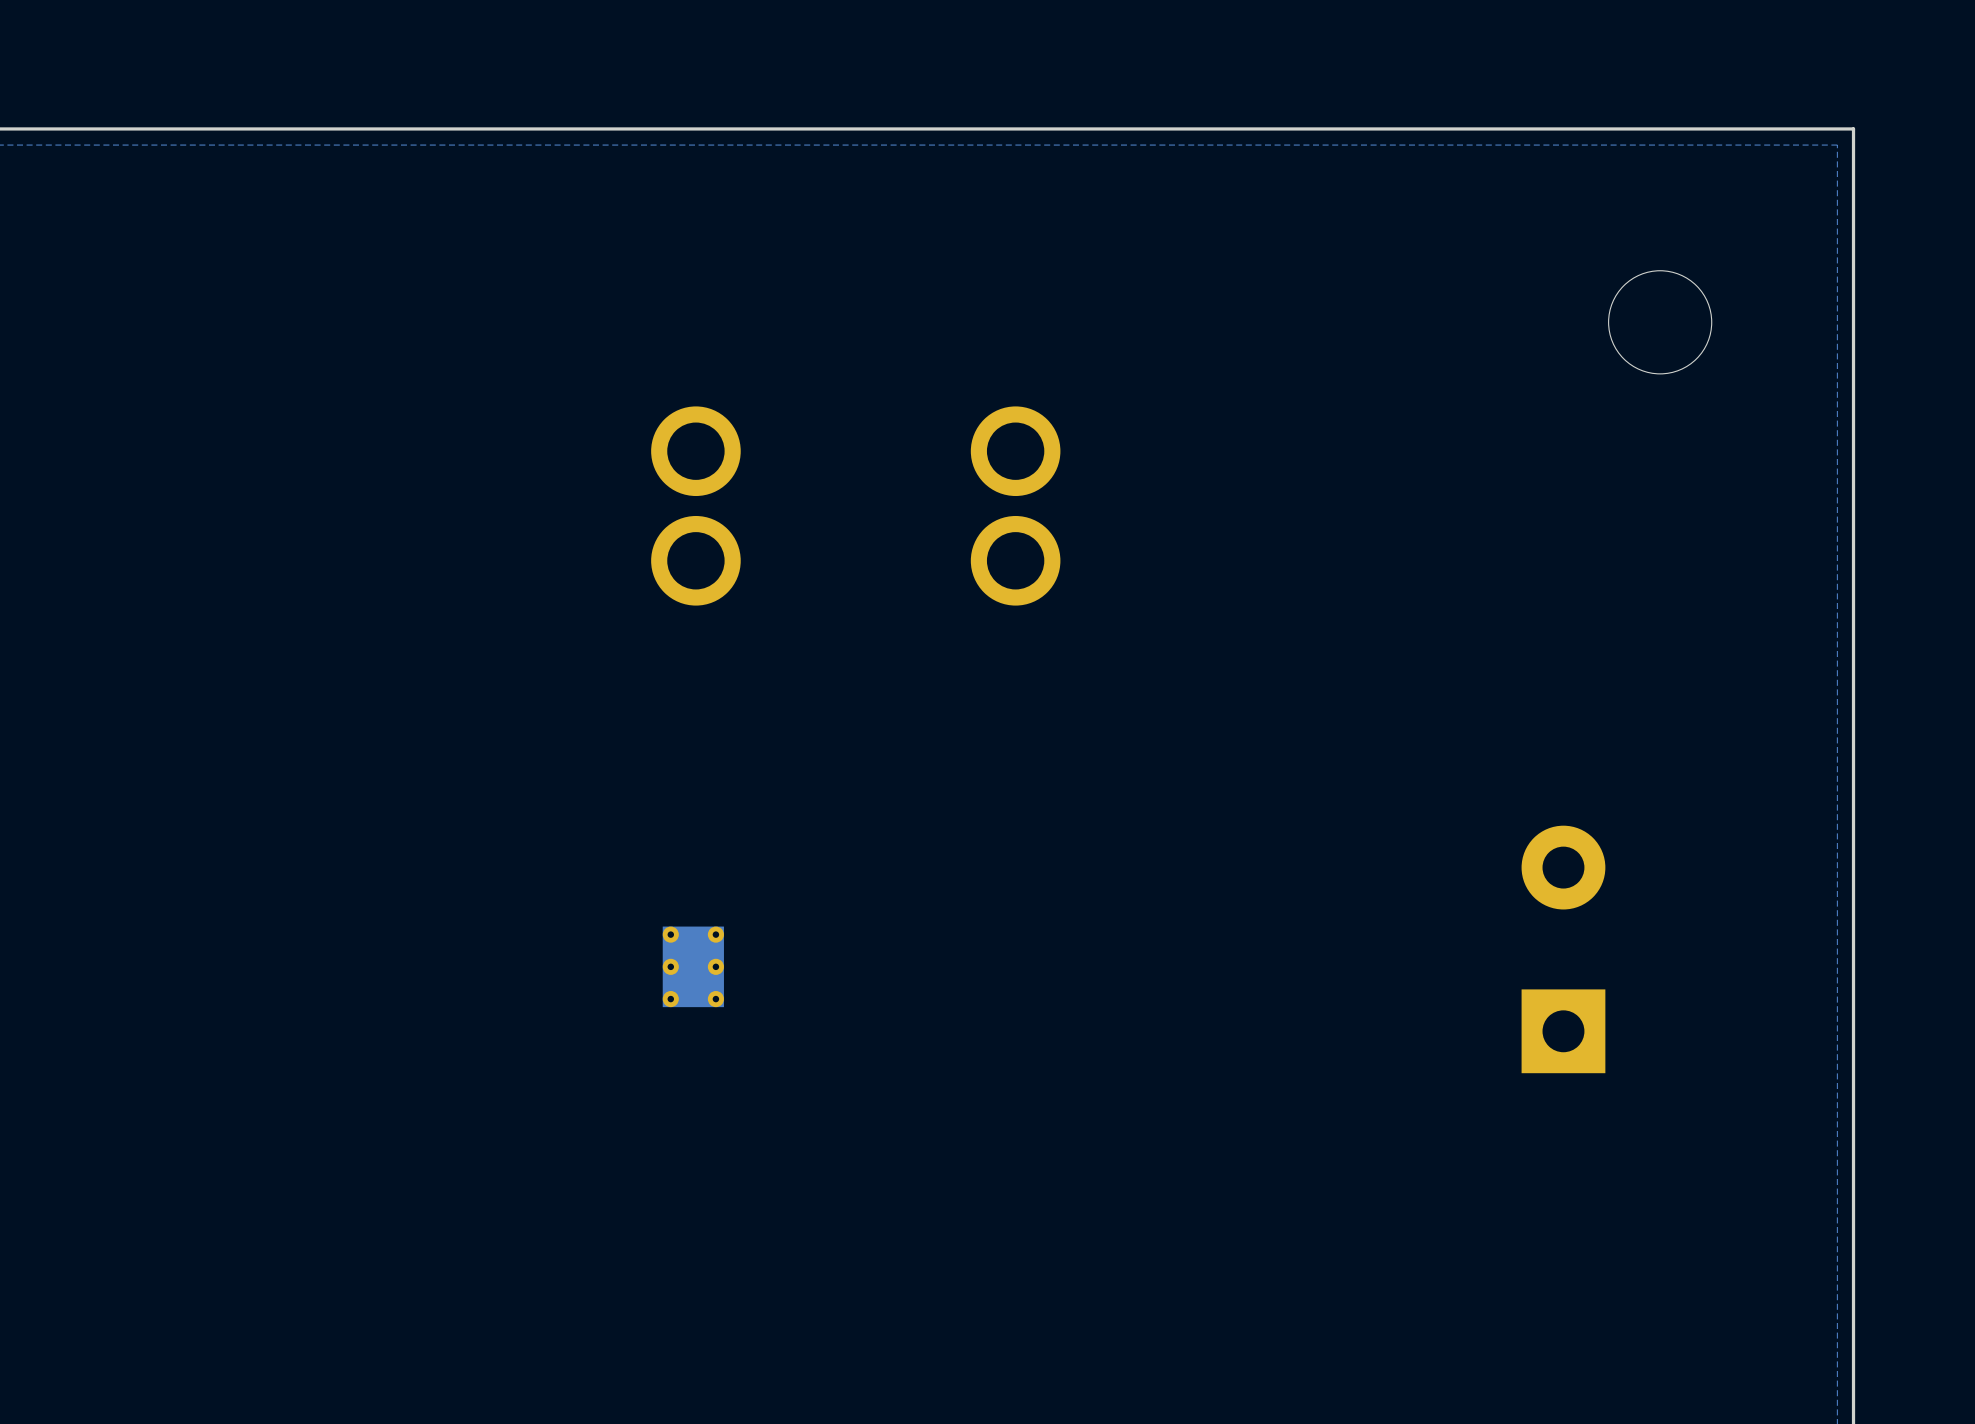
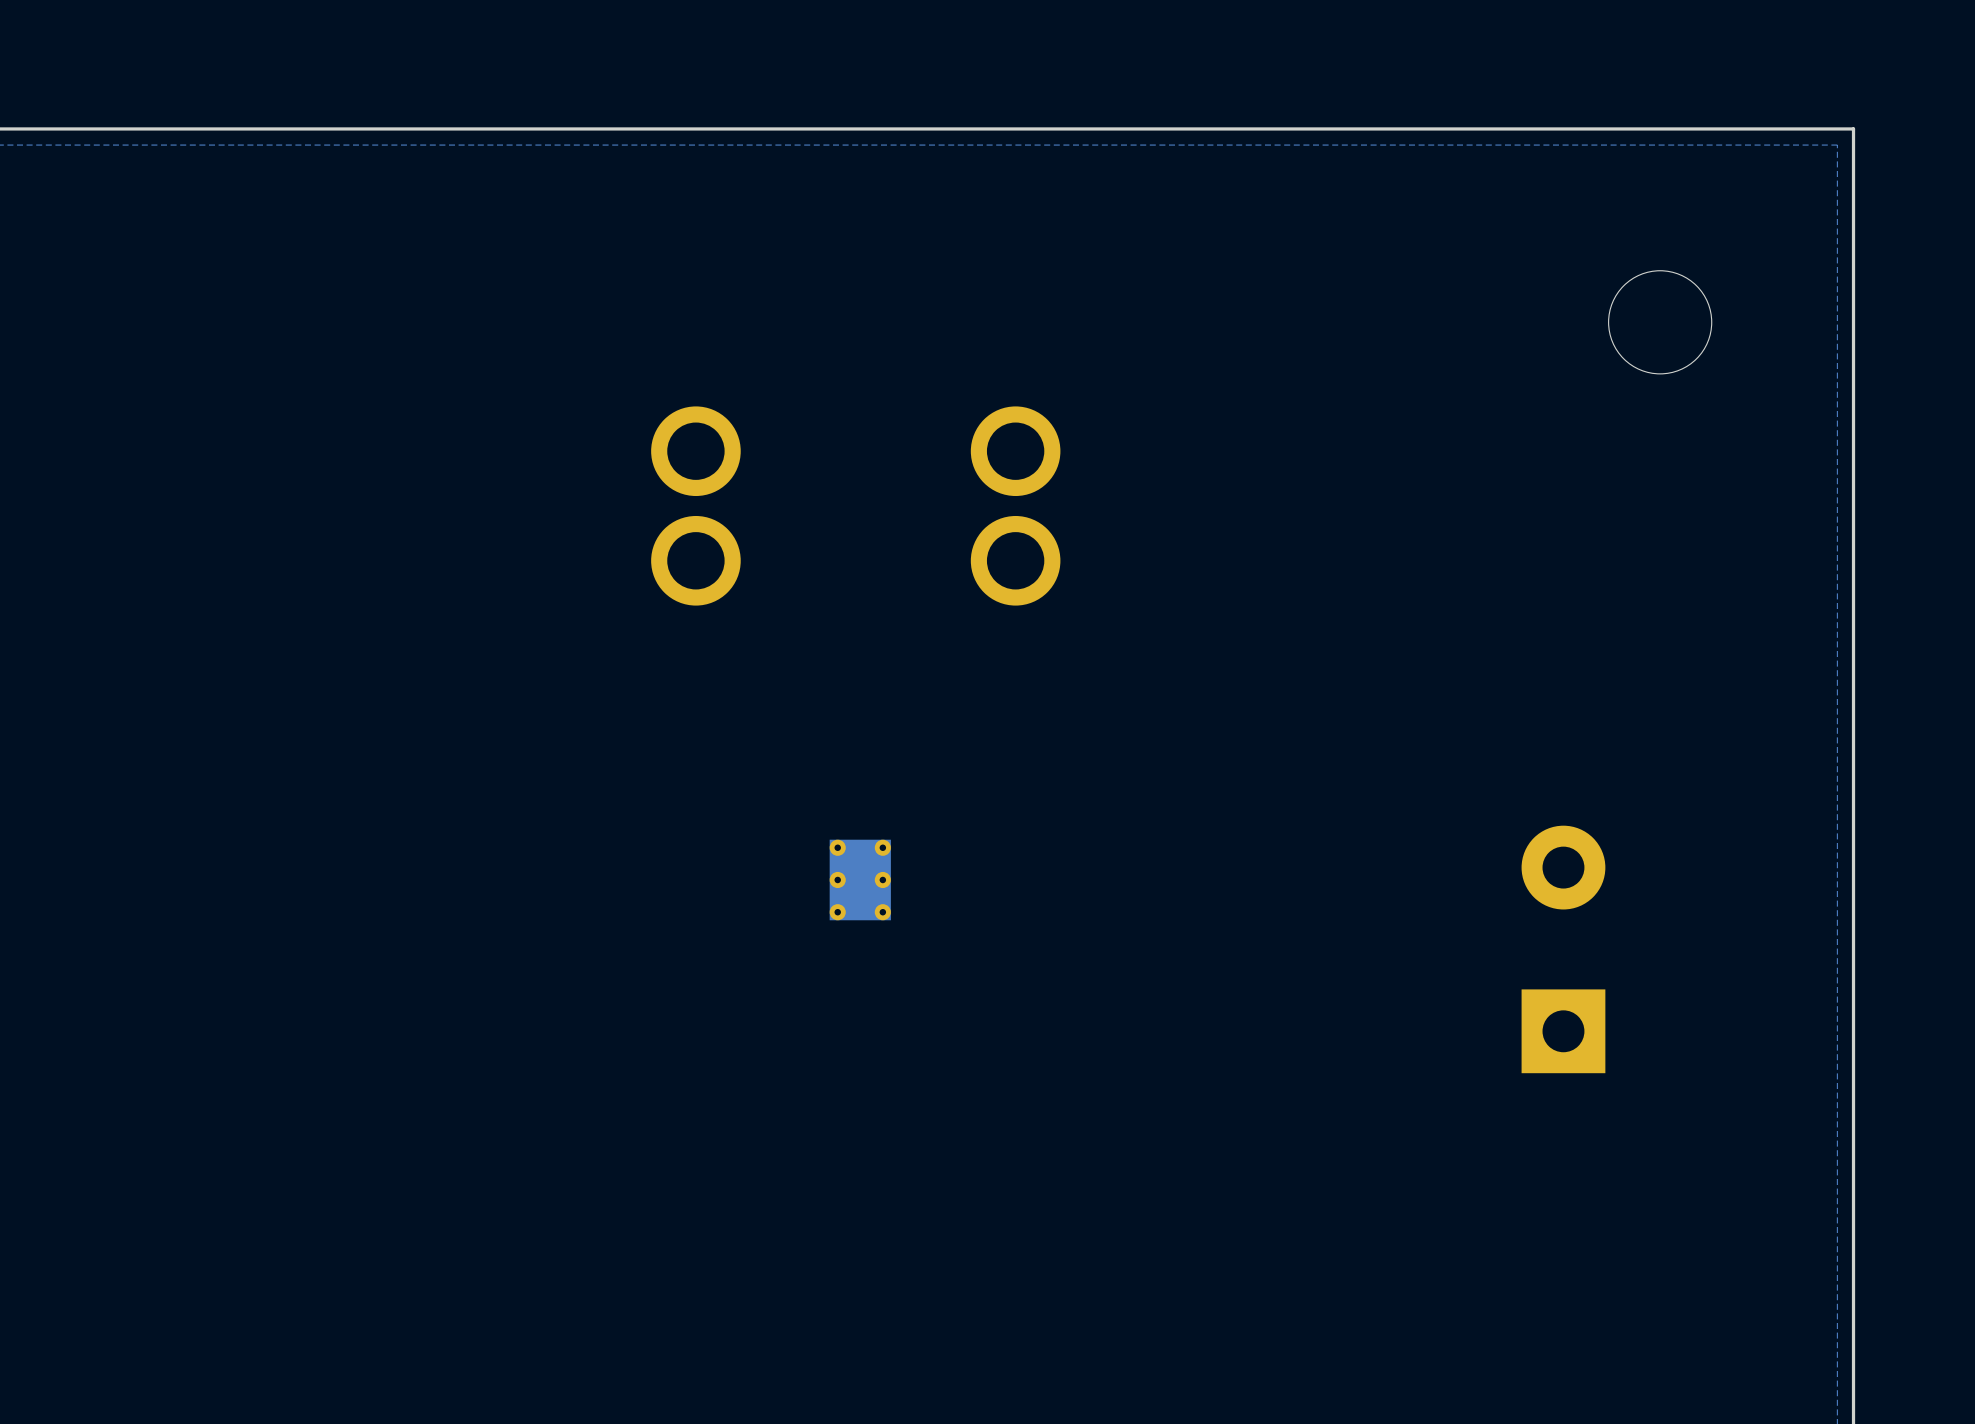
part position: (693, 966) -> (860, 879)

